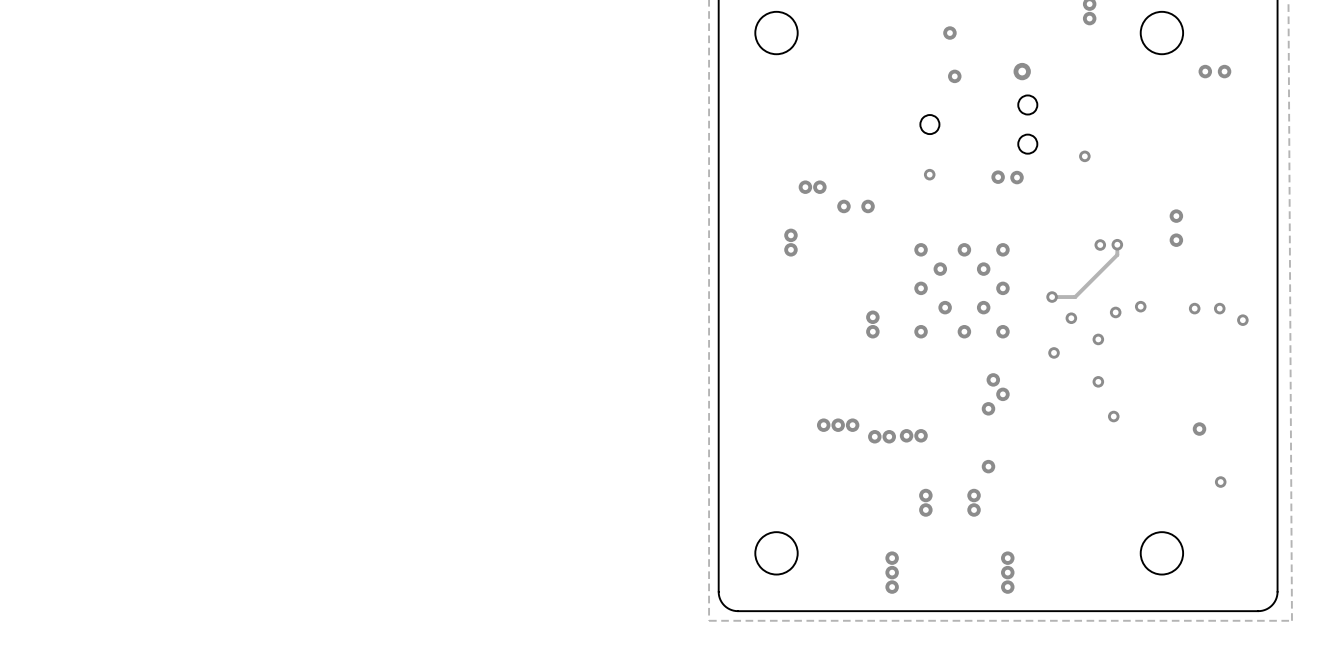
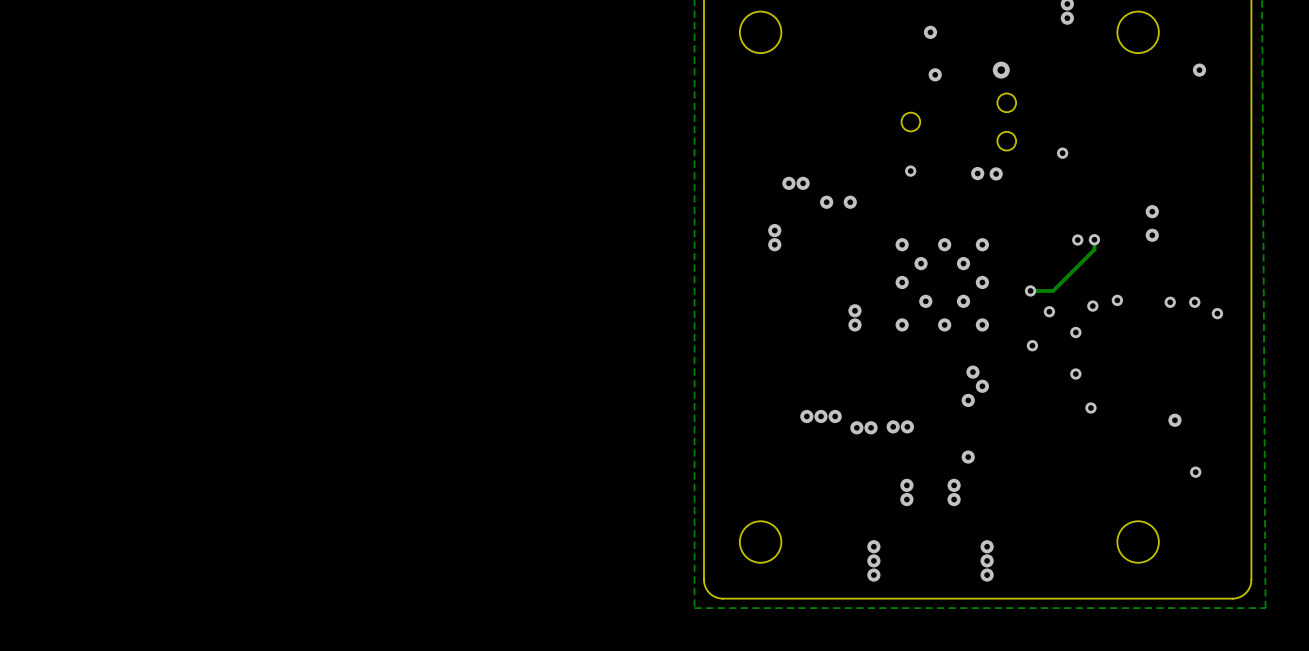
via: (1205, 71) -> none
via: (906, 435) -> none
via: none -> (893, 426)
via: (921, 435) -> none
via: none -> (907, 426)

